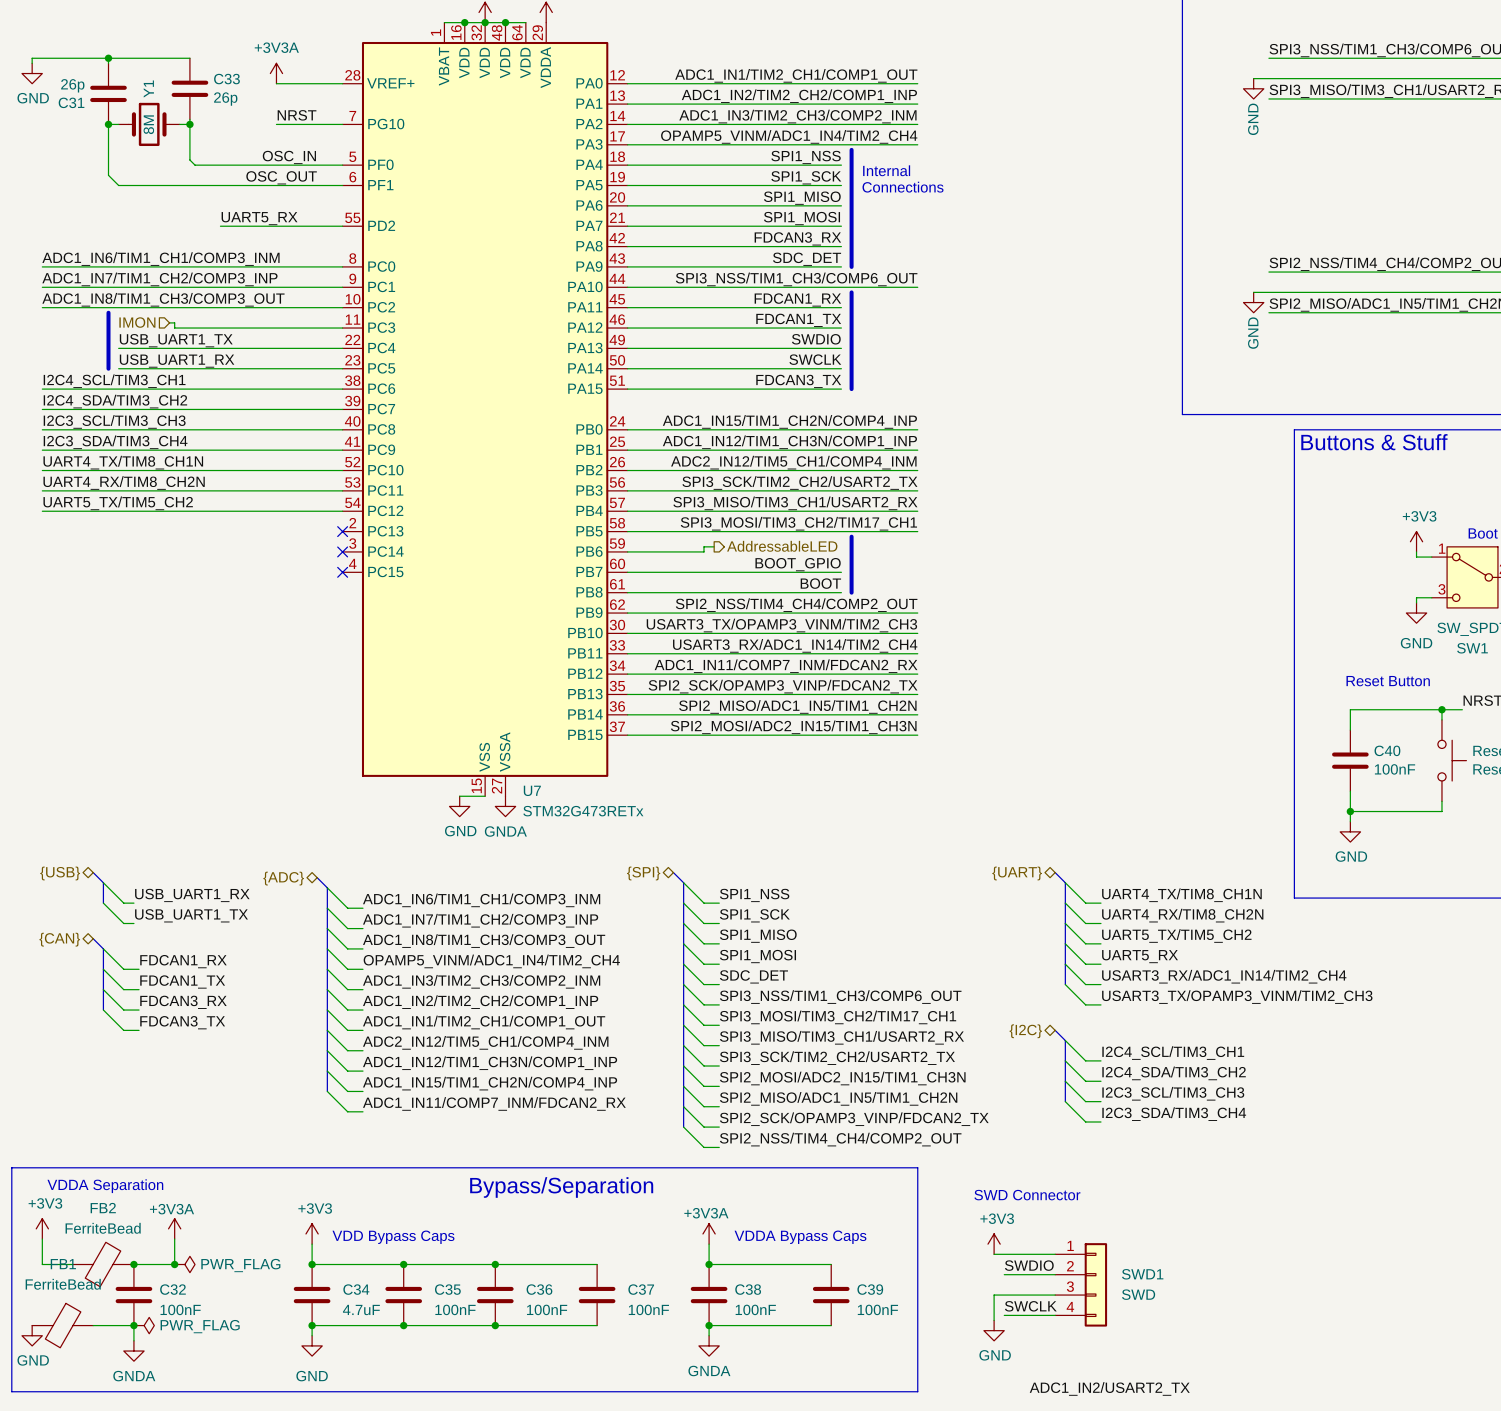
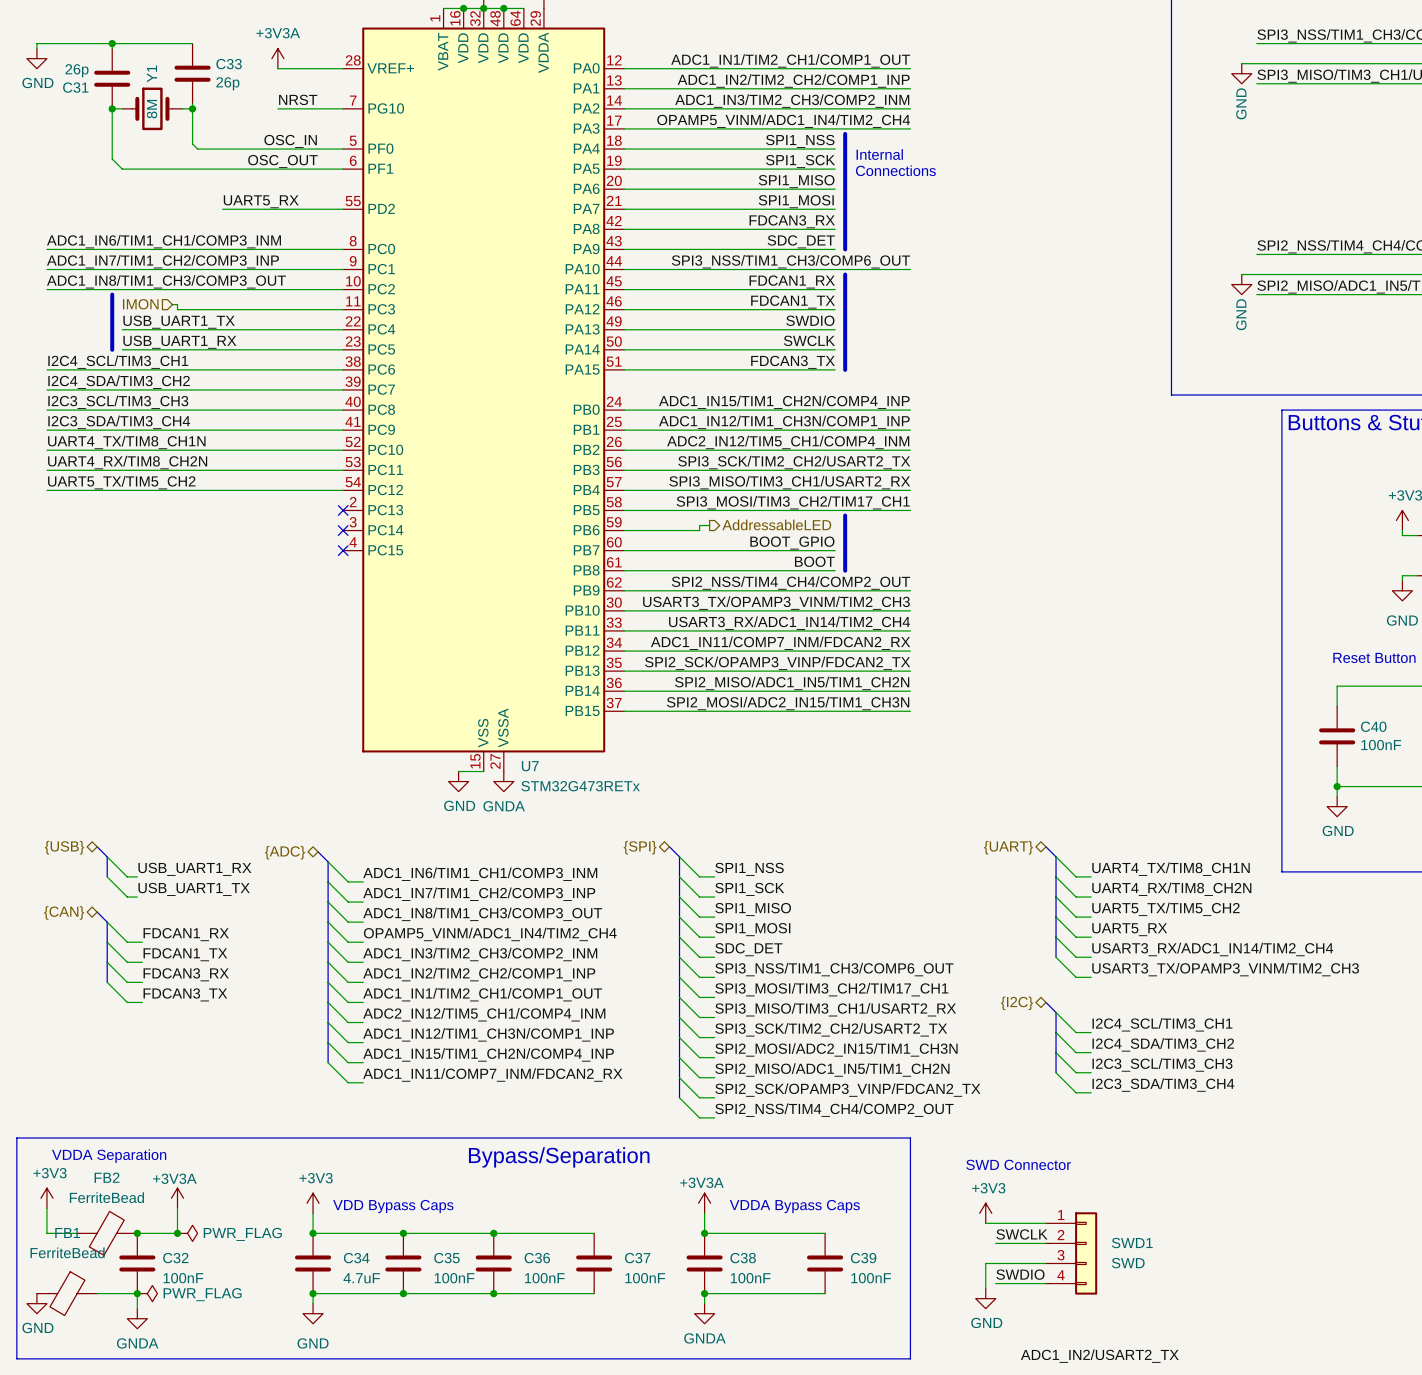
label: SWDIO (1029, 1265) -> SWCLK (1021, 1234)
label: SWCLK (1030, 1306) -> SWDIO (1020, 1274)

